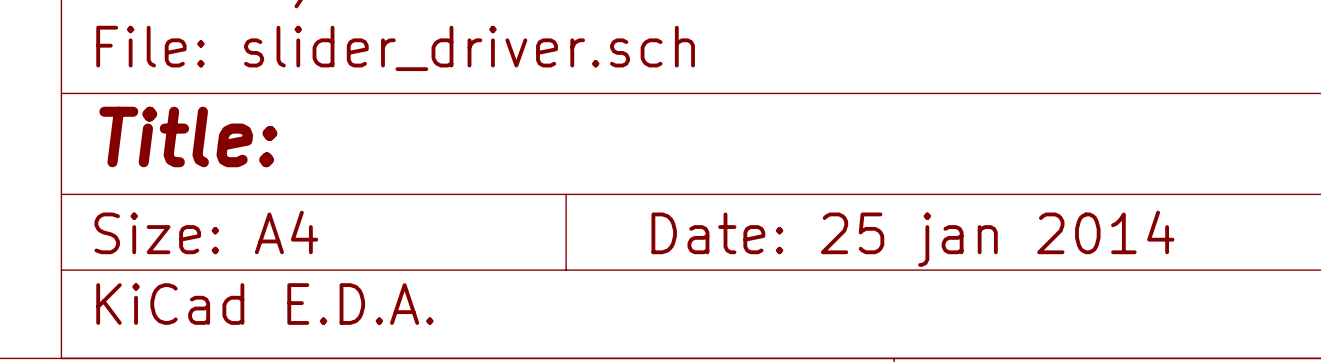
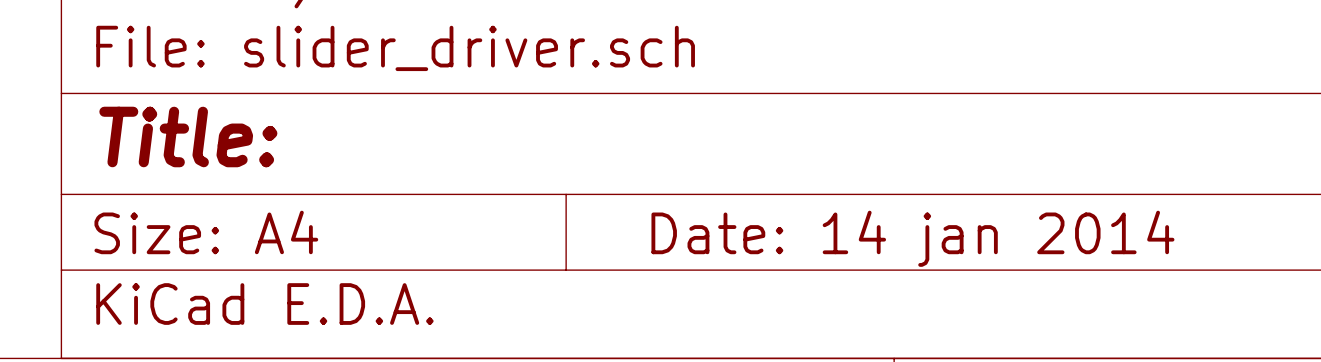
title block: Date: 25 jan 2014 (912, 238) -> Date: 14 jan 2014 (912, 238)

